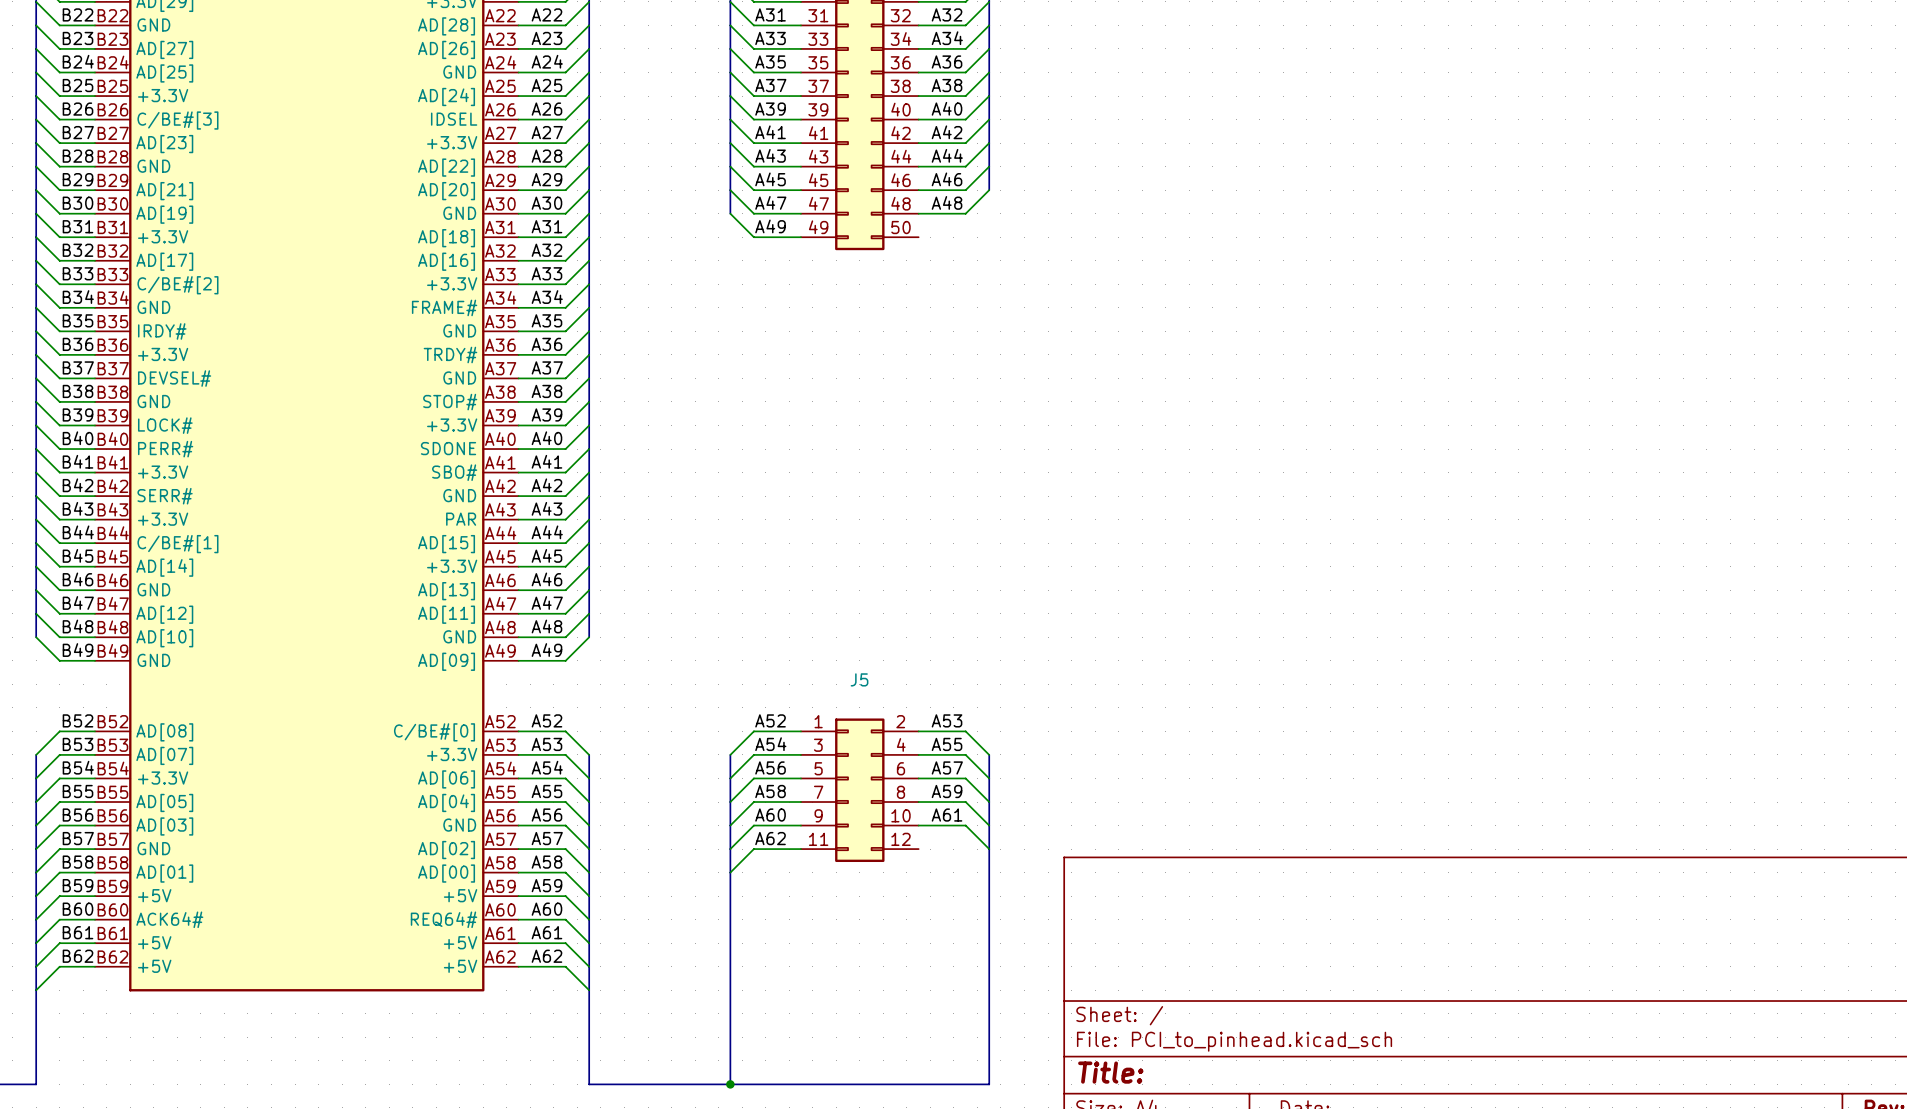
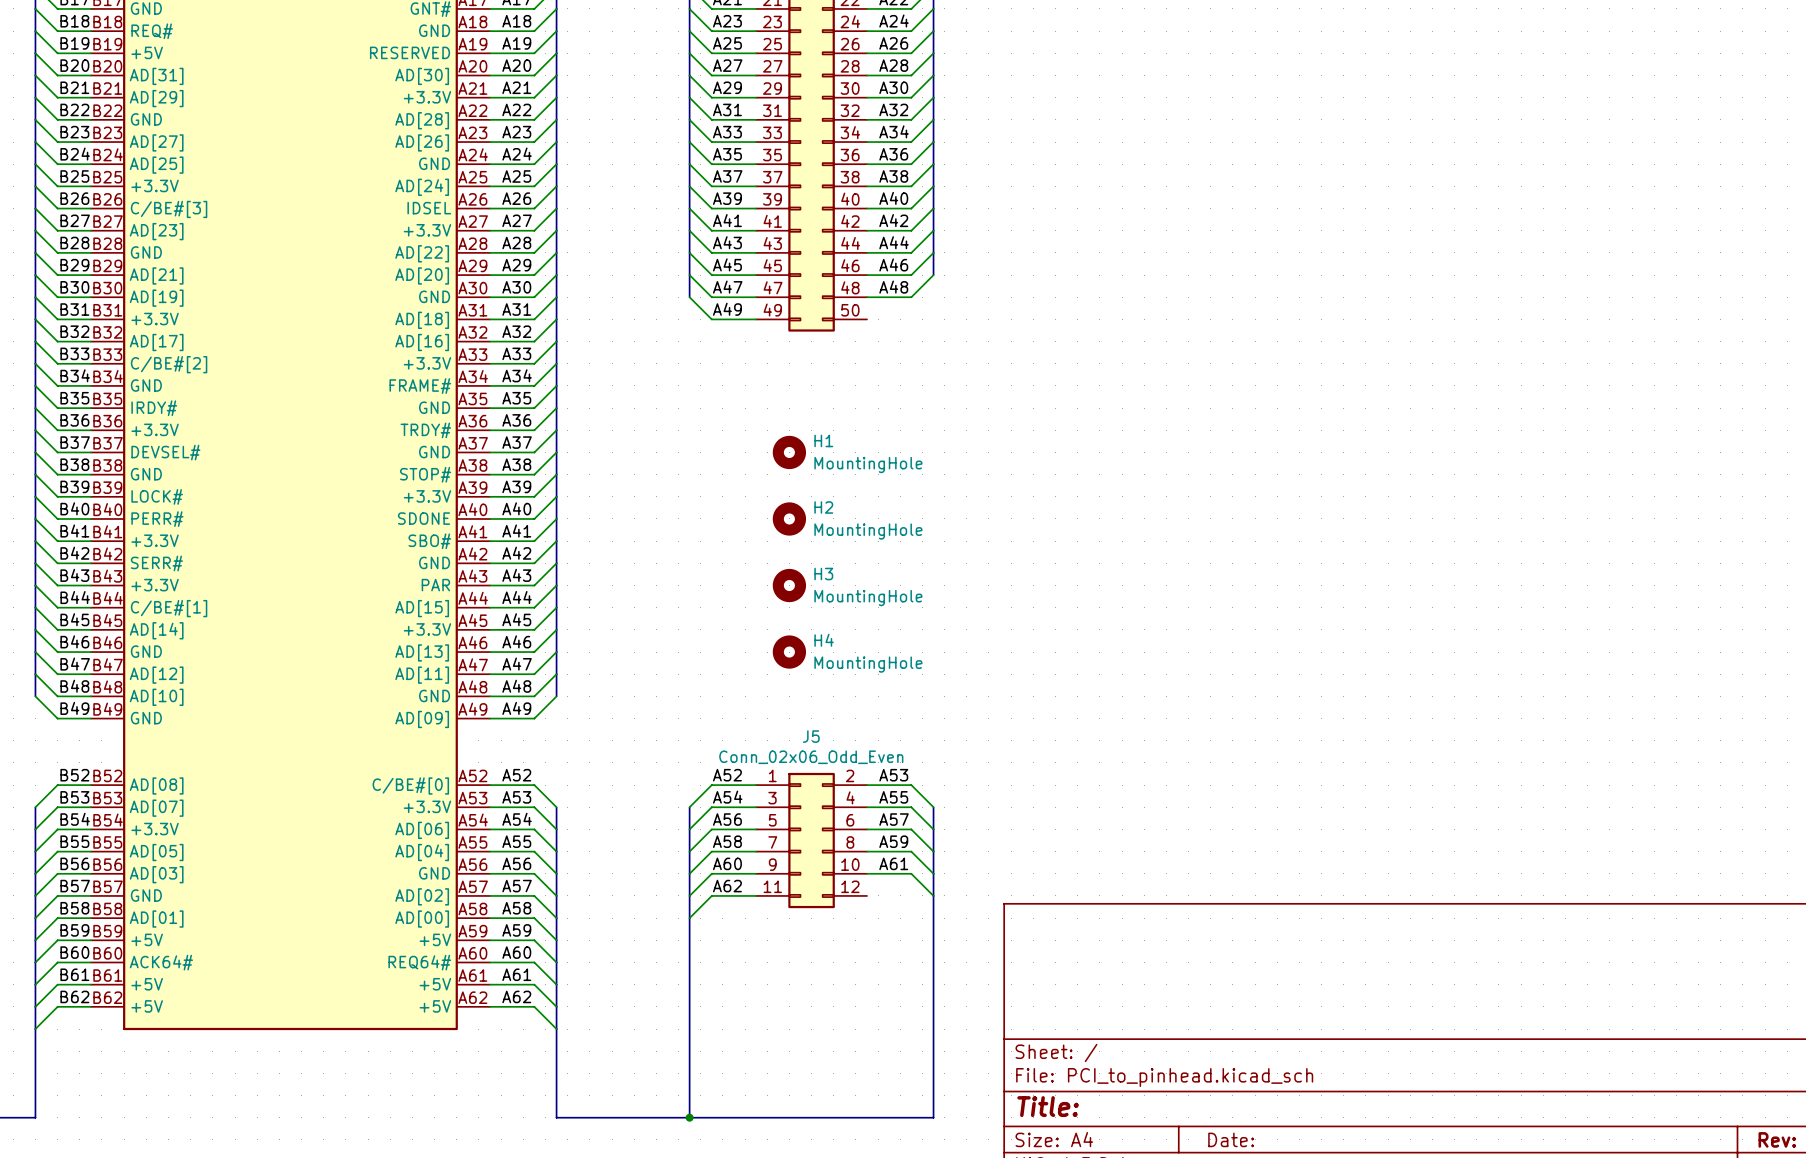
H1: none -> MountingHole (789, 452)
H2: none -> MountingHole (789, 518)
H3: none -> MountingHole (789, 585)
H4: none -> MountingHole (789, 652)
J5 value: none -> Conn_02x06_Odd_Even (811, 757)

